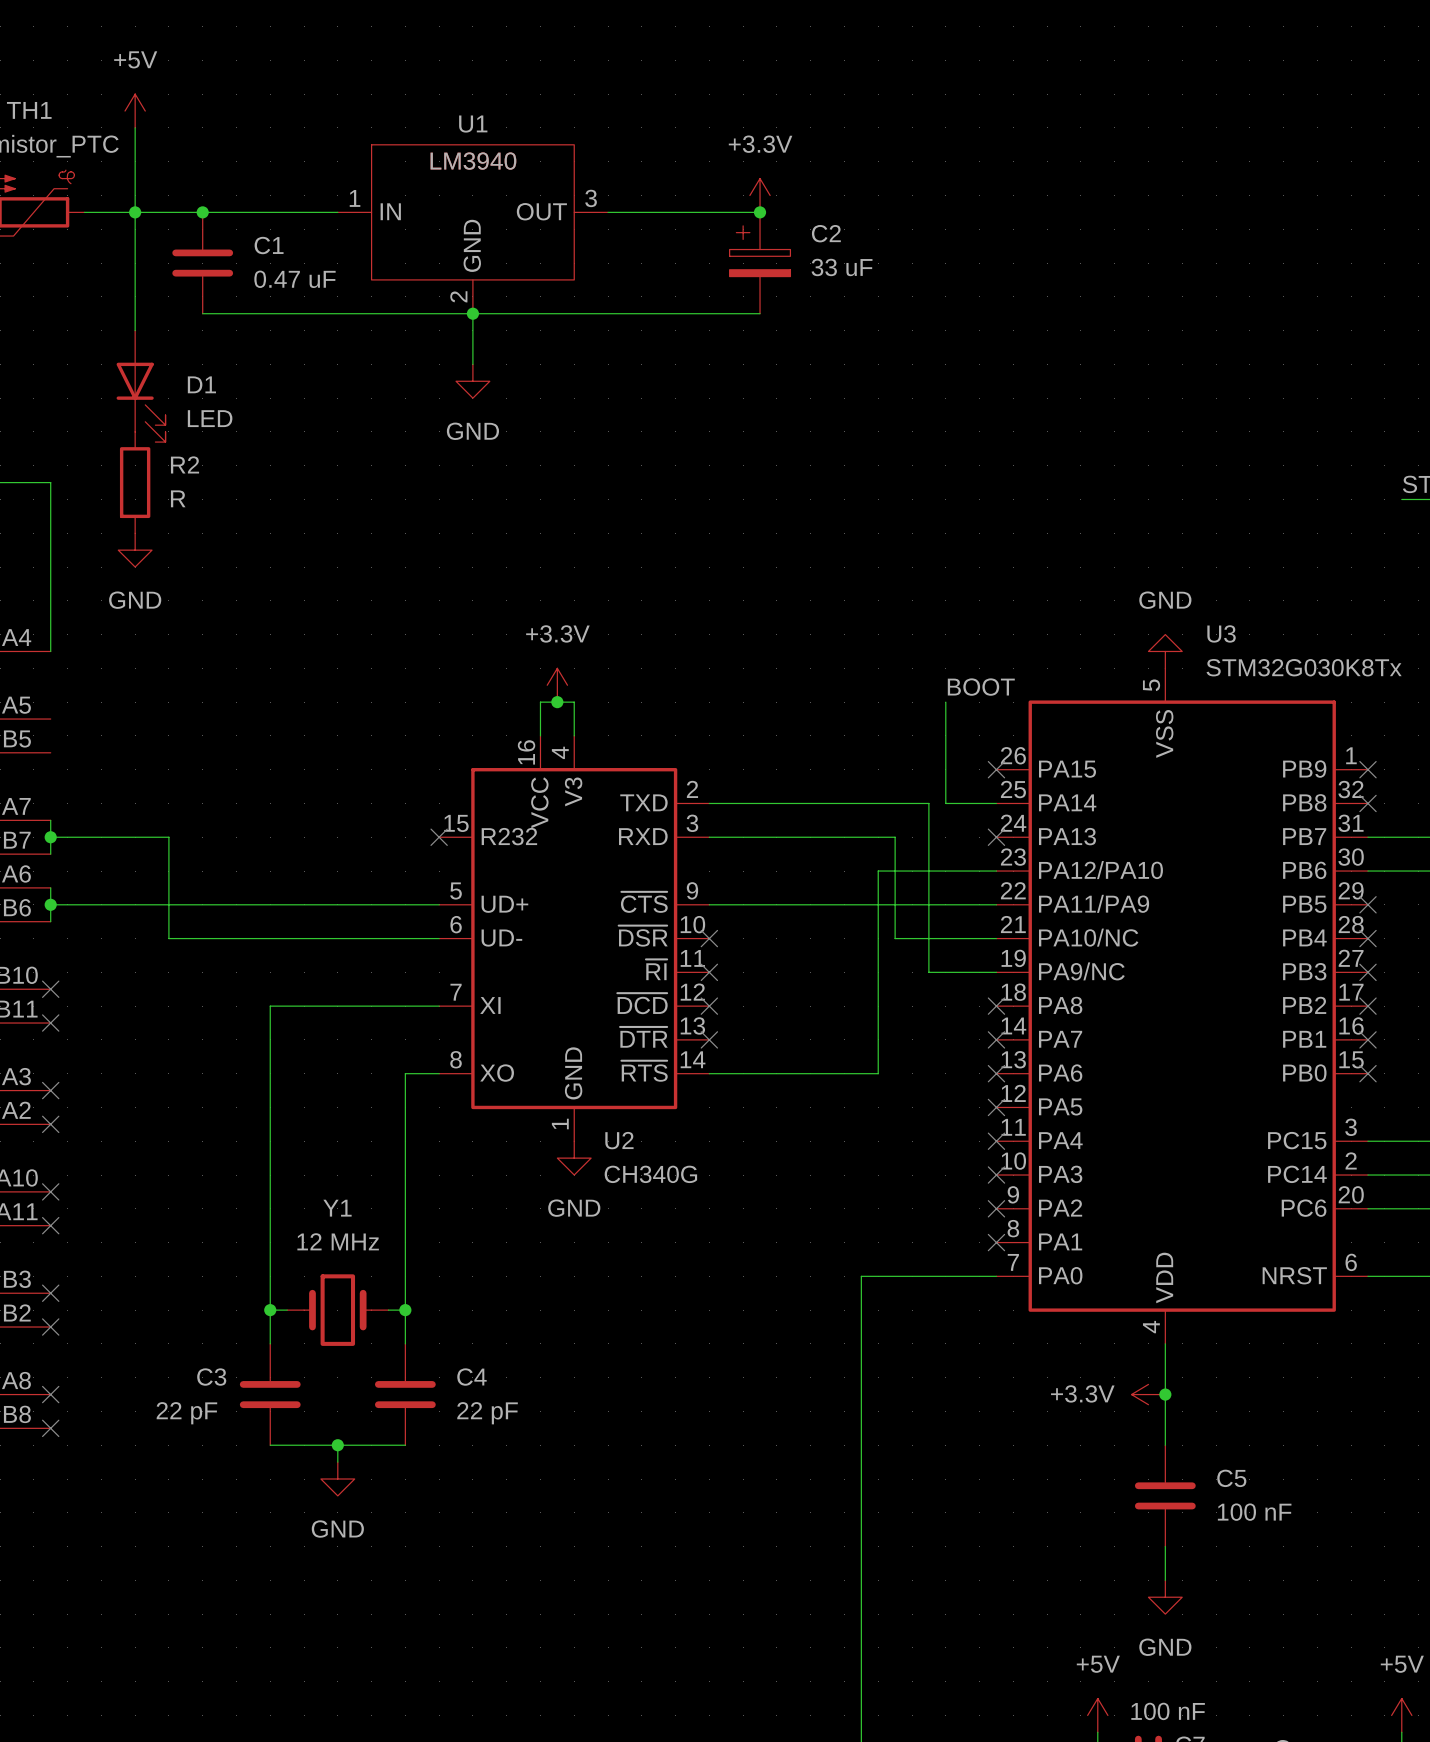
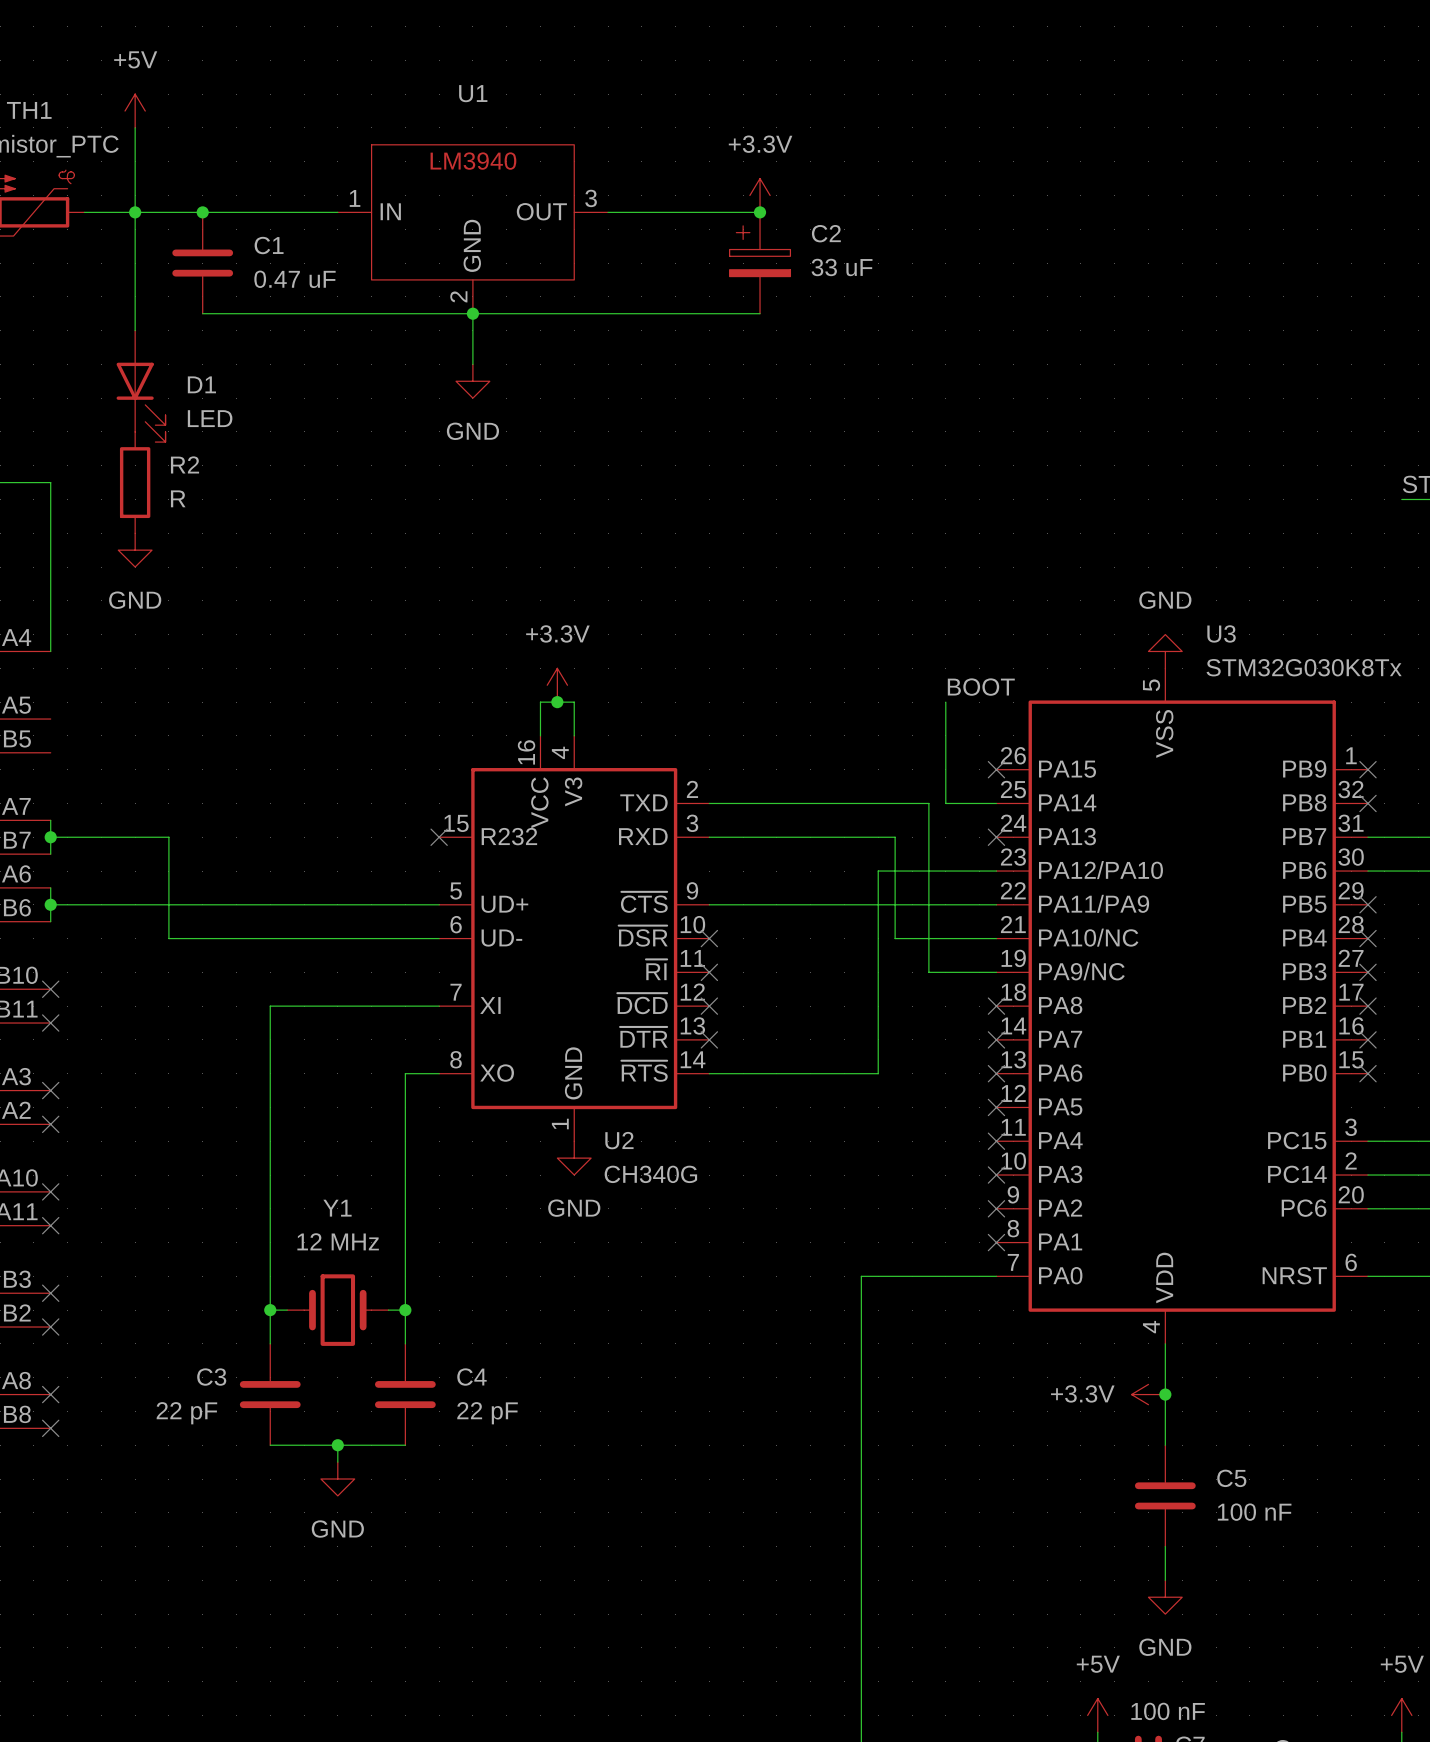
U1 name position: U1 (473, 124) -> U1 (473, 93)
U1 value: LM3940 (473, 161) -> none

